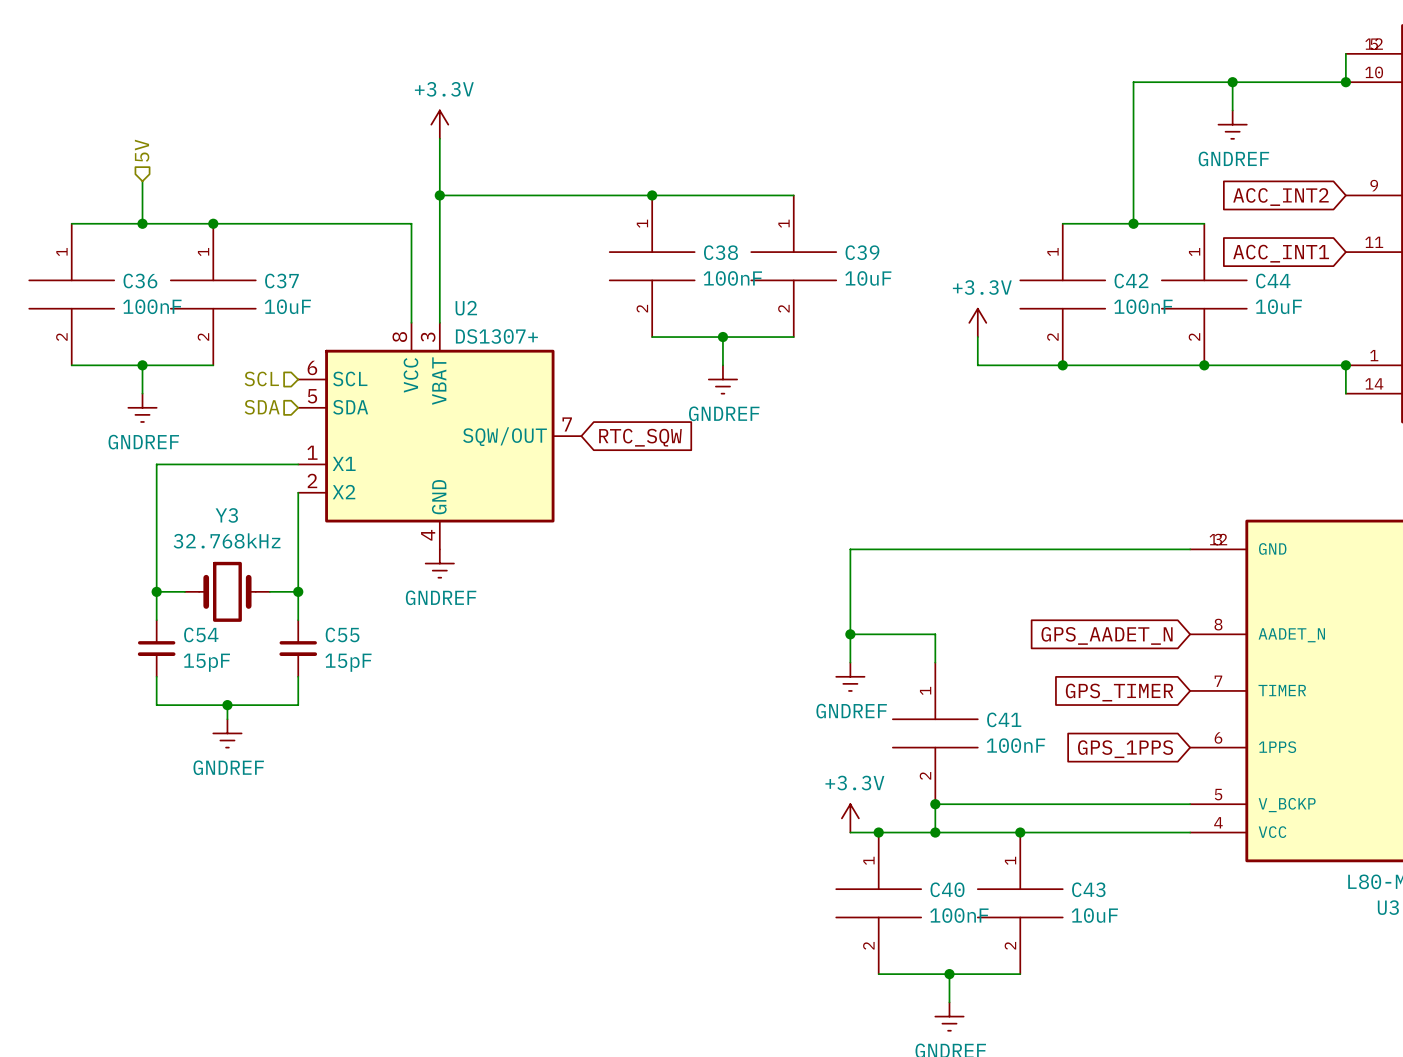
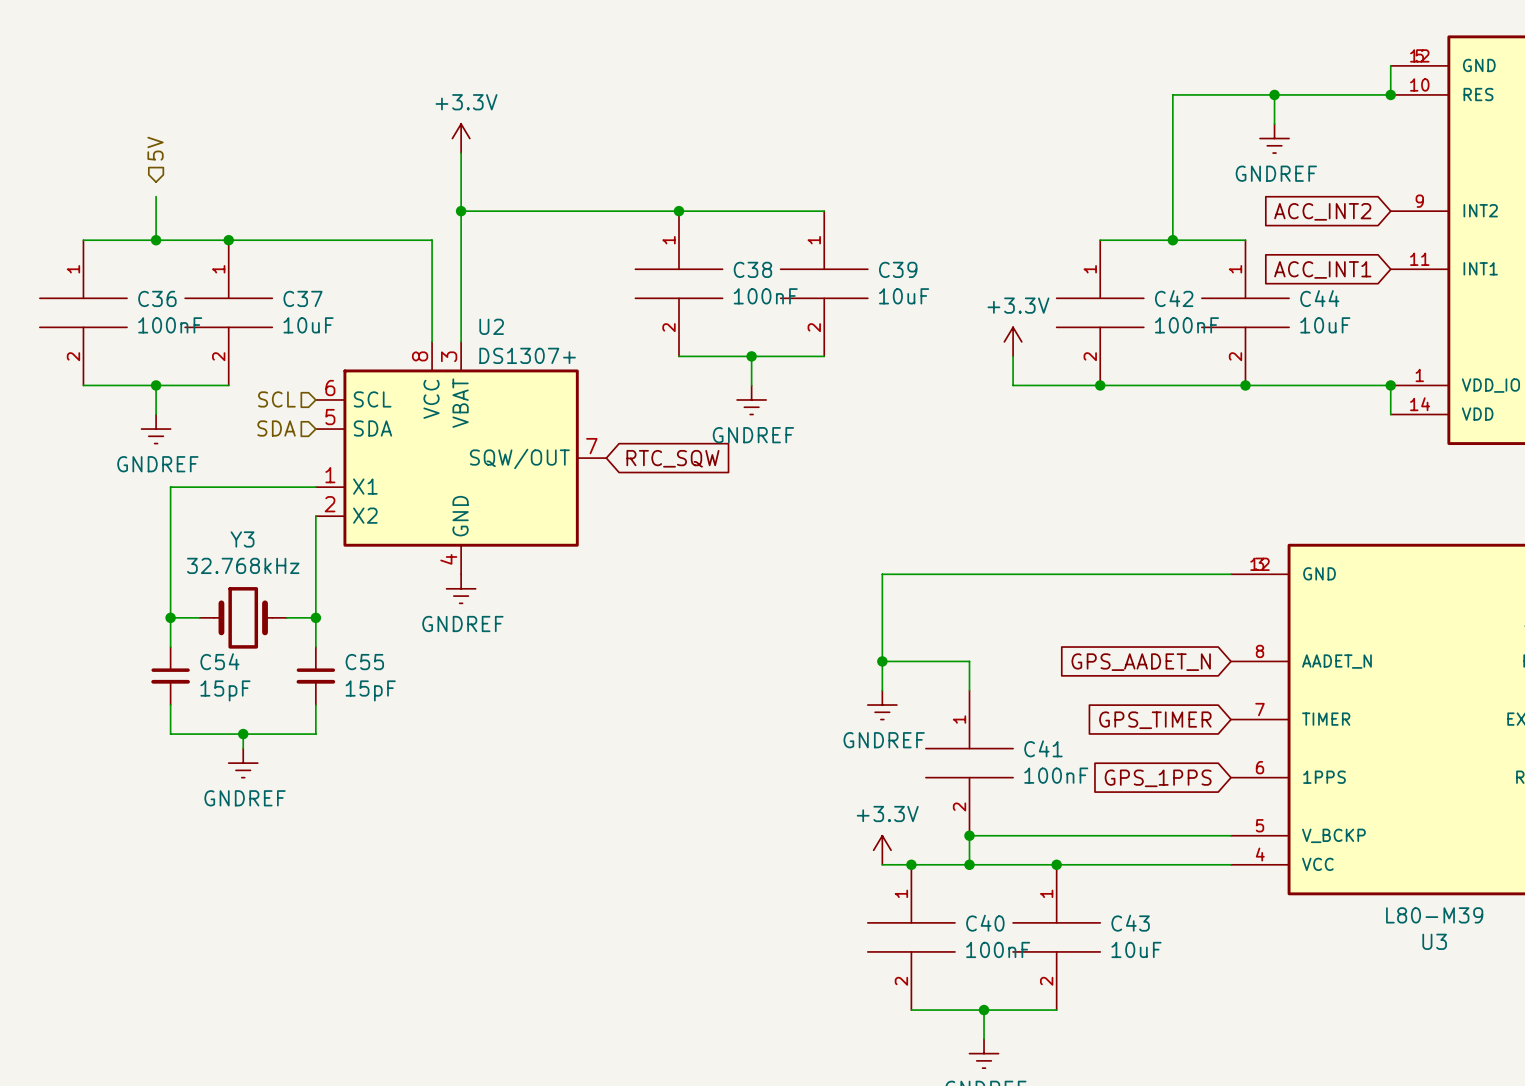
hierarchical label position: 5V (142, 150) -> 5V (155, 148)

